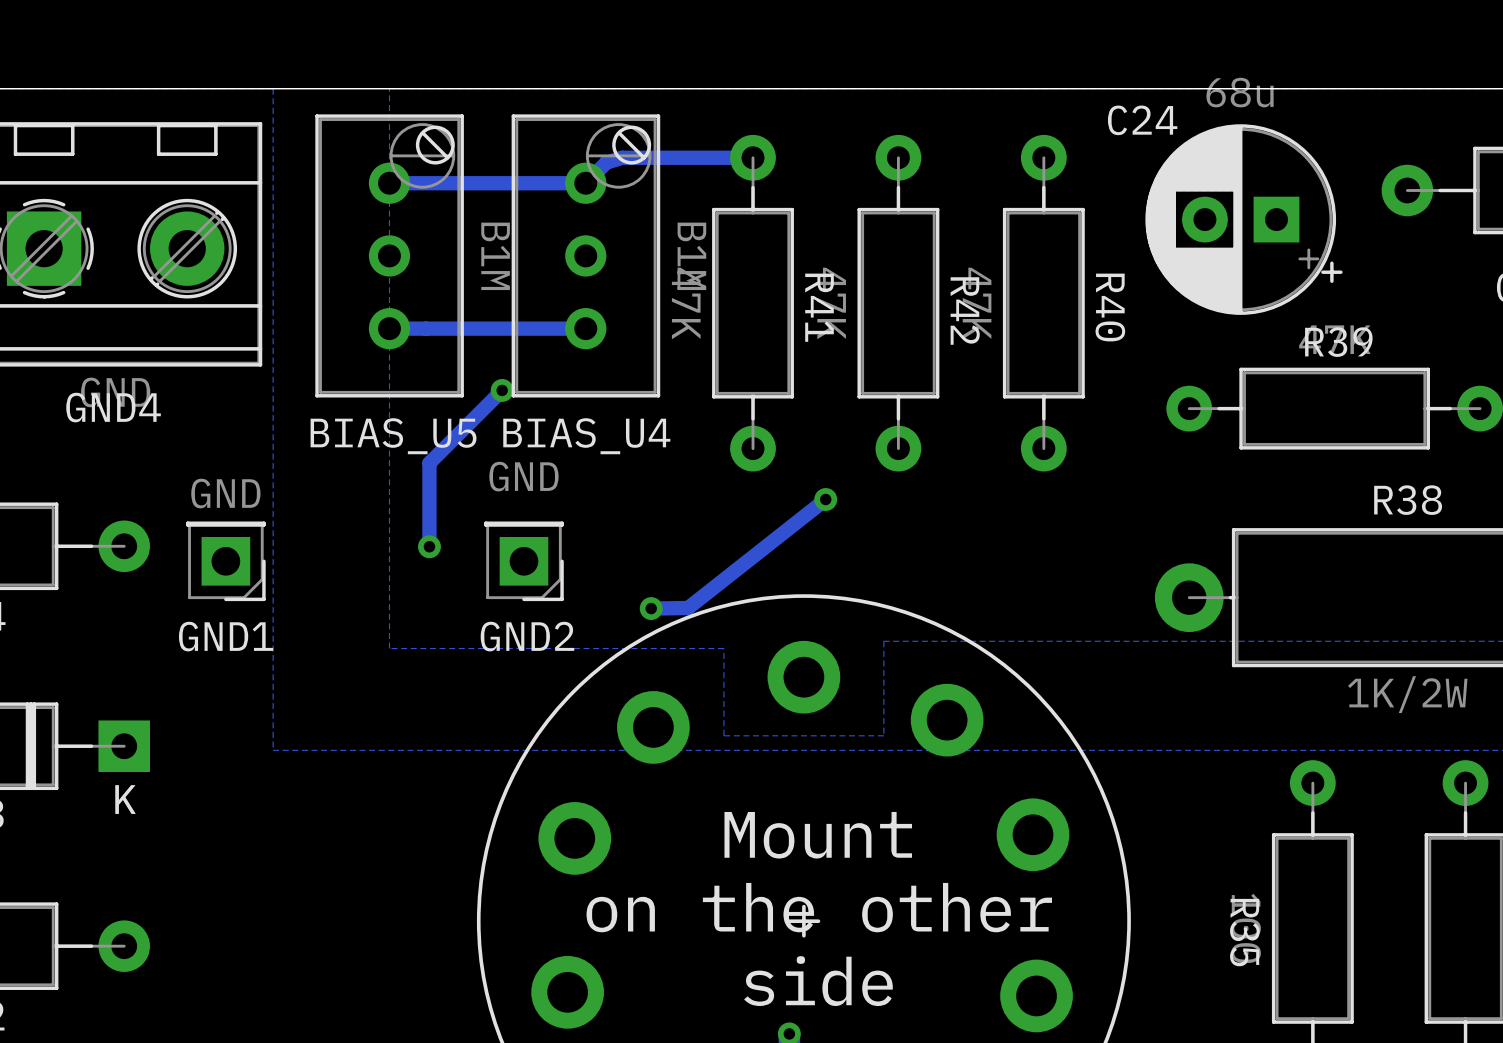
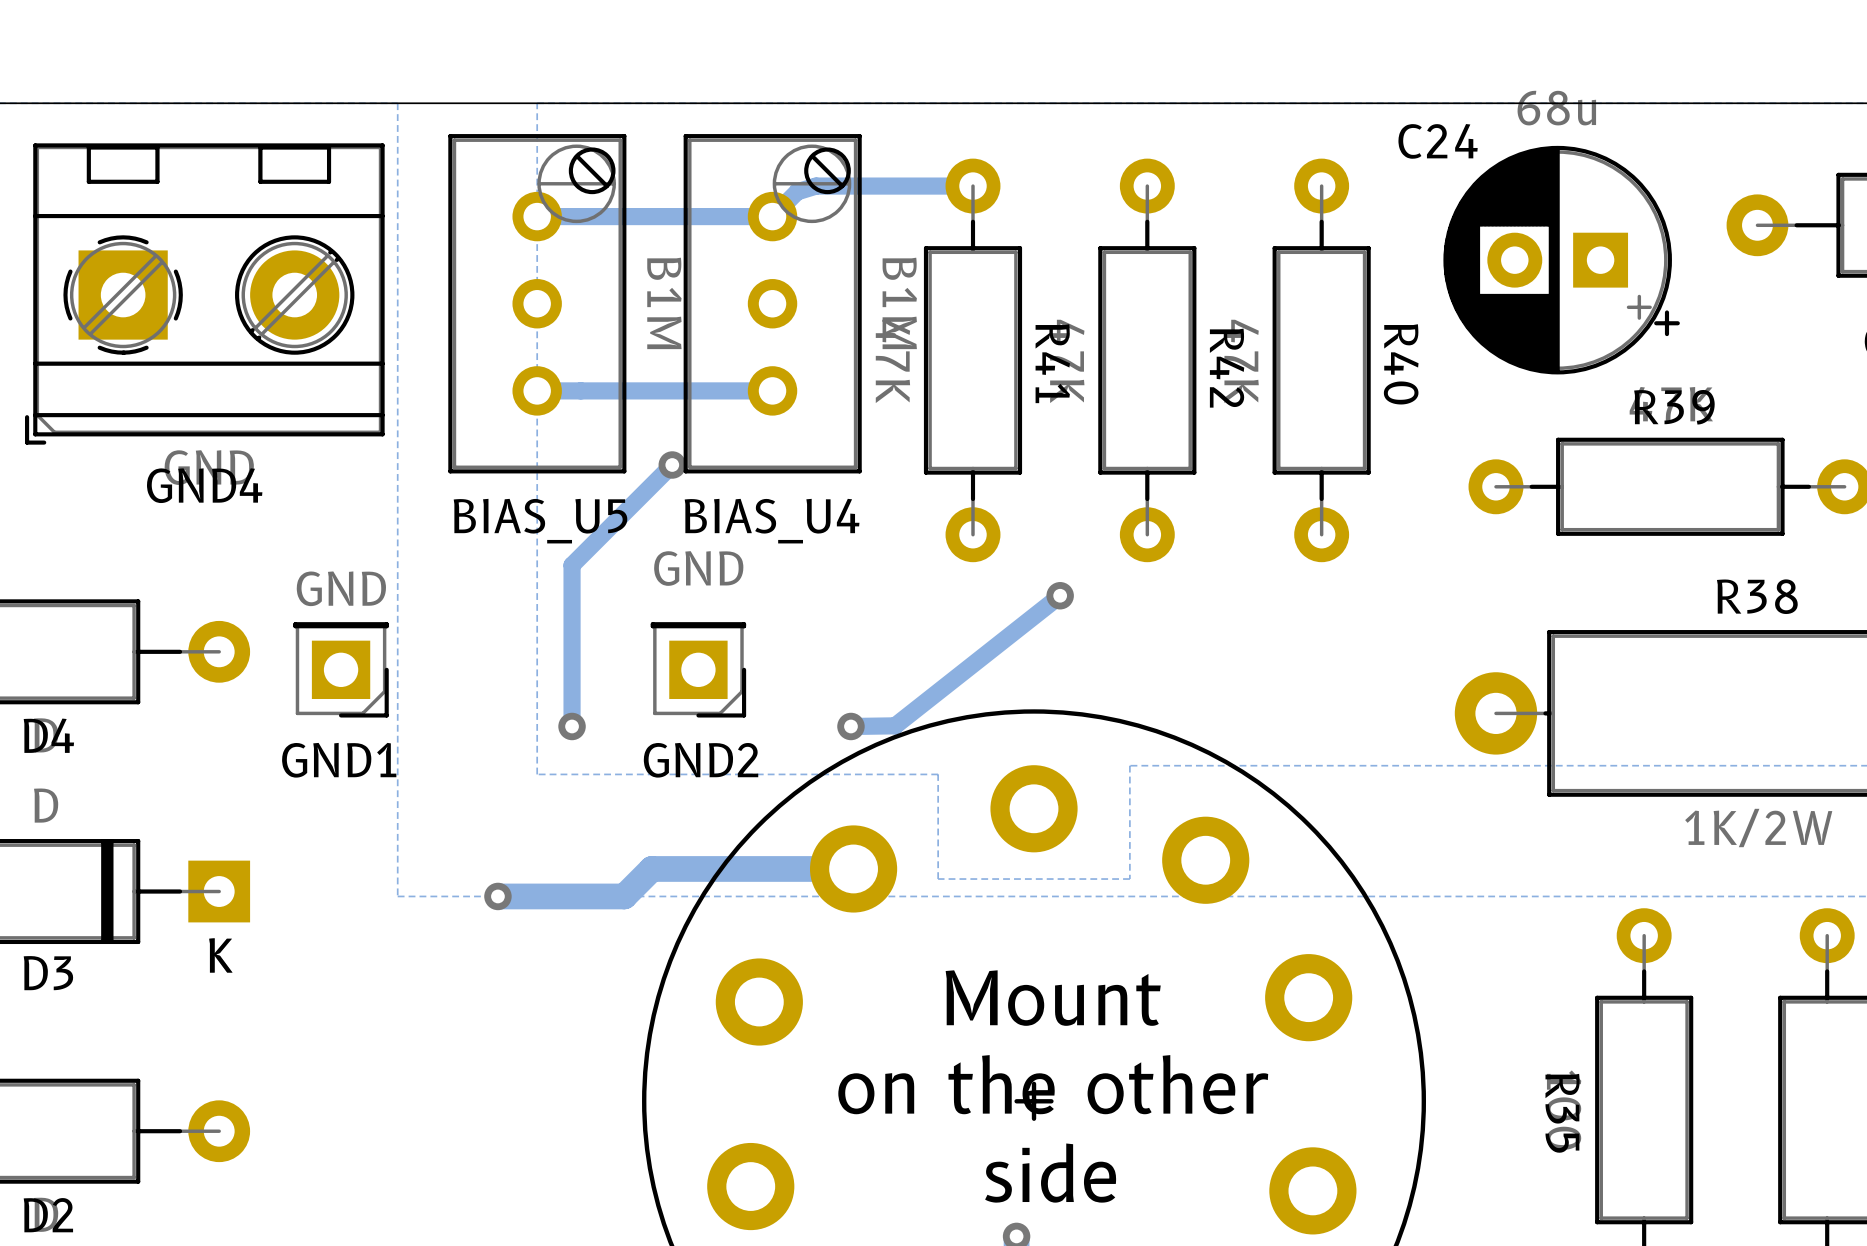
track: (429, 463) (429, 546) -> (585, 552) (572, 565) (572, 726)
via position: (429, 546) -> (572, 726)
track: none -> (847, 874) (853, 868) (651, 868) (624, 896) (497, 896)
via: none -> (497, 896)

